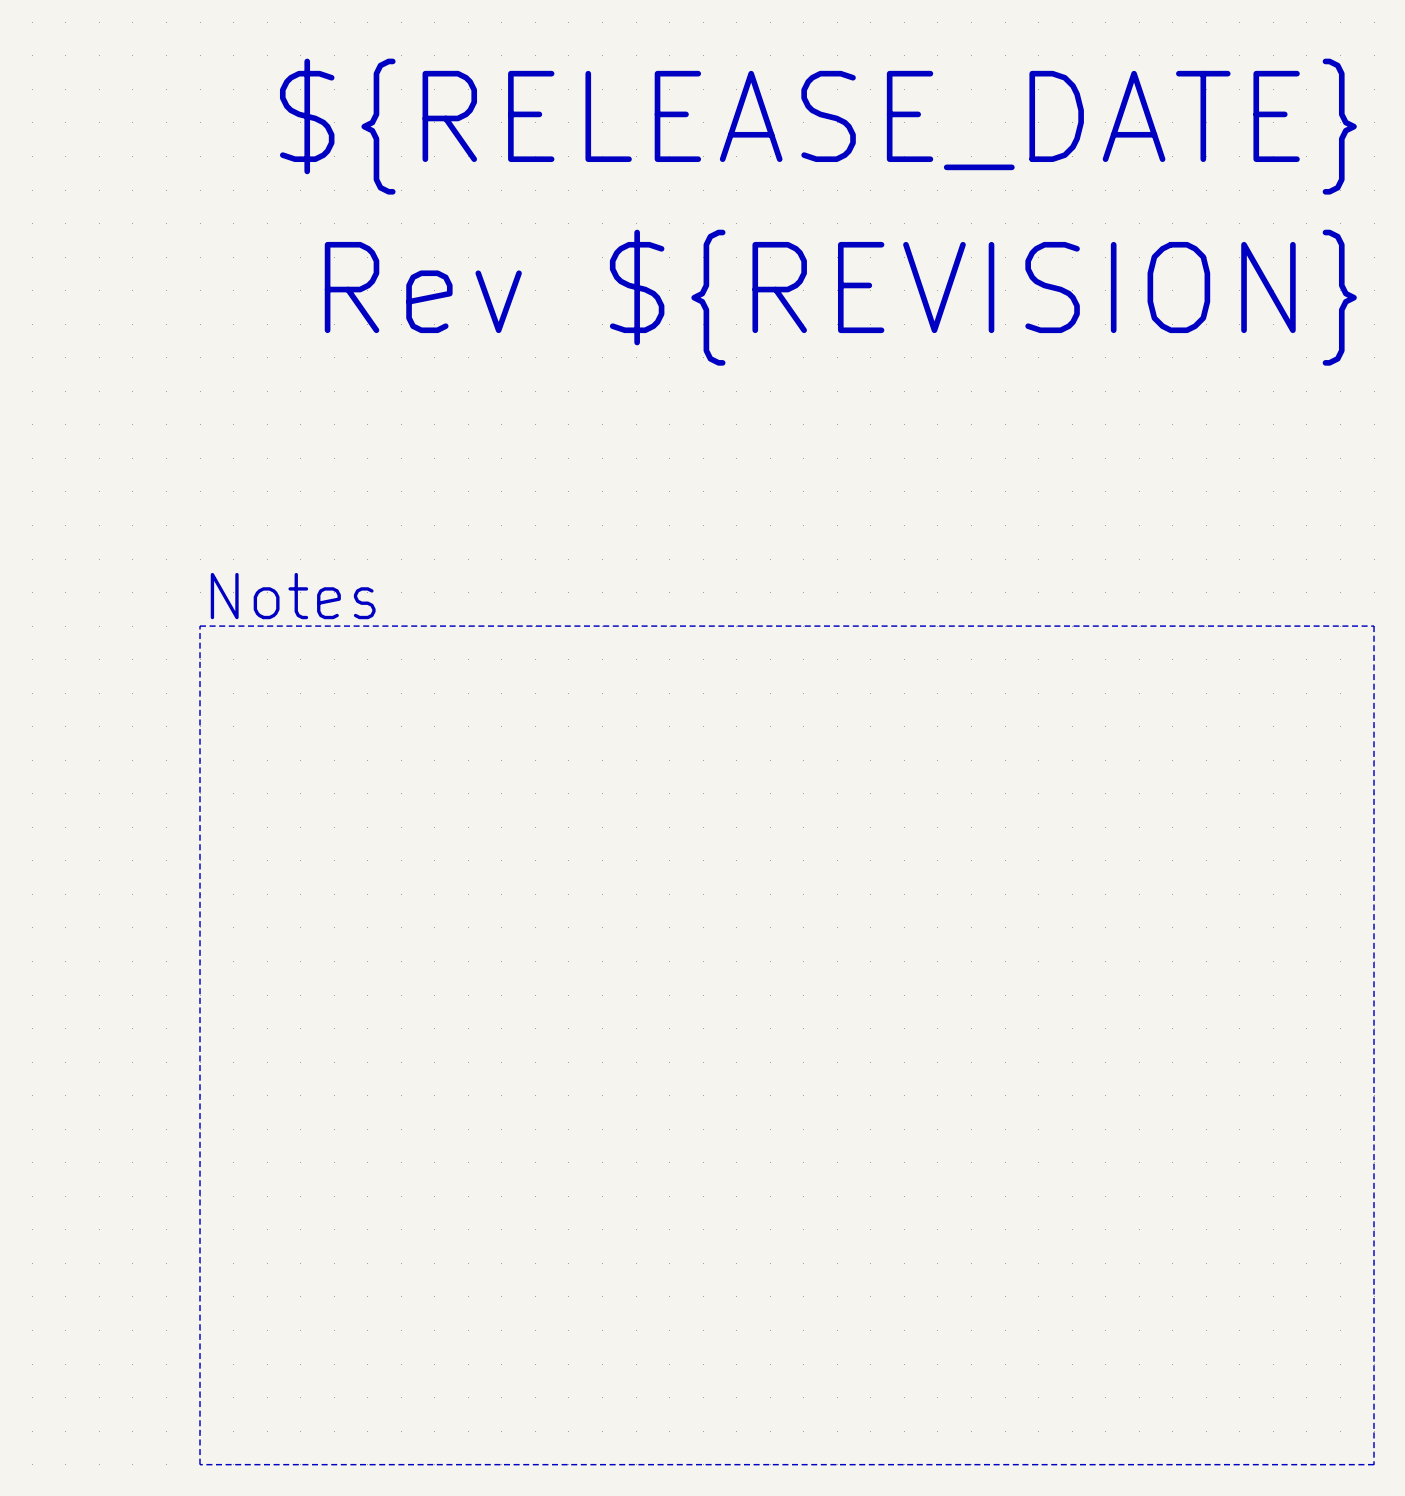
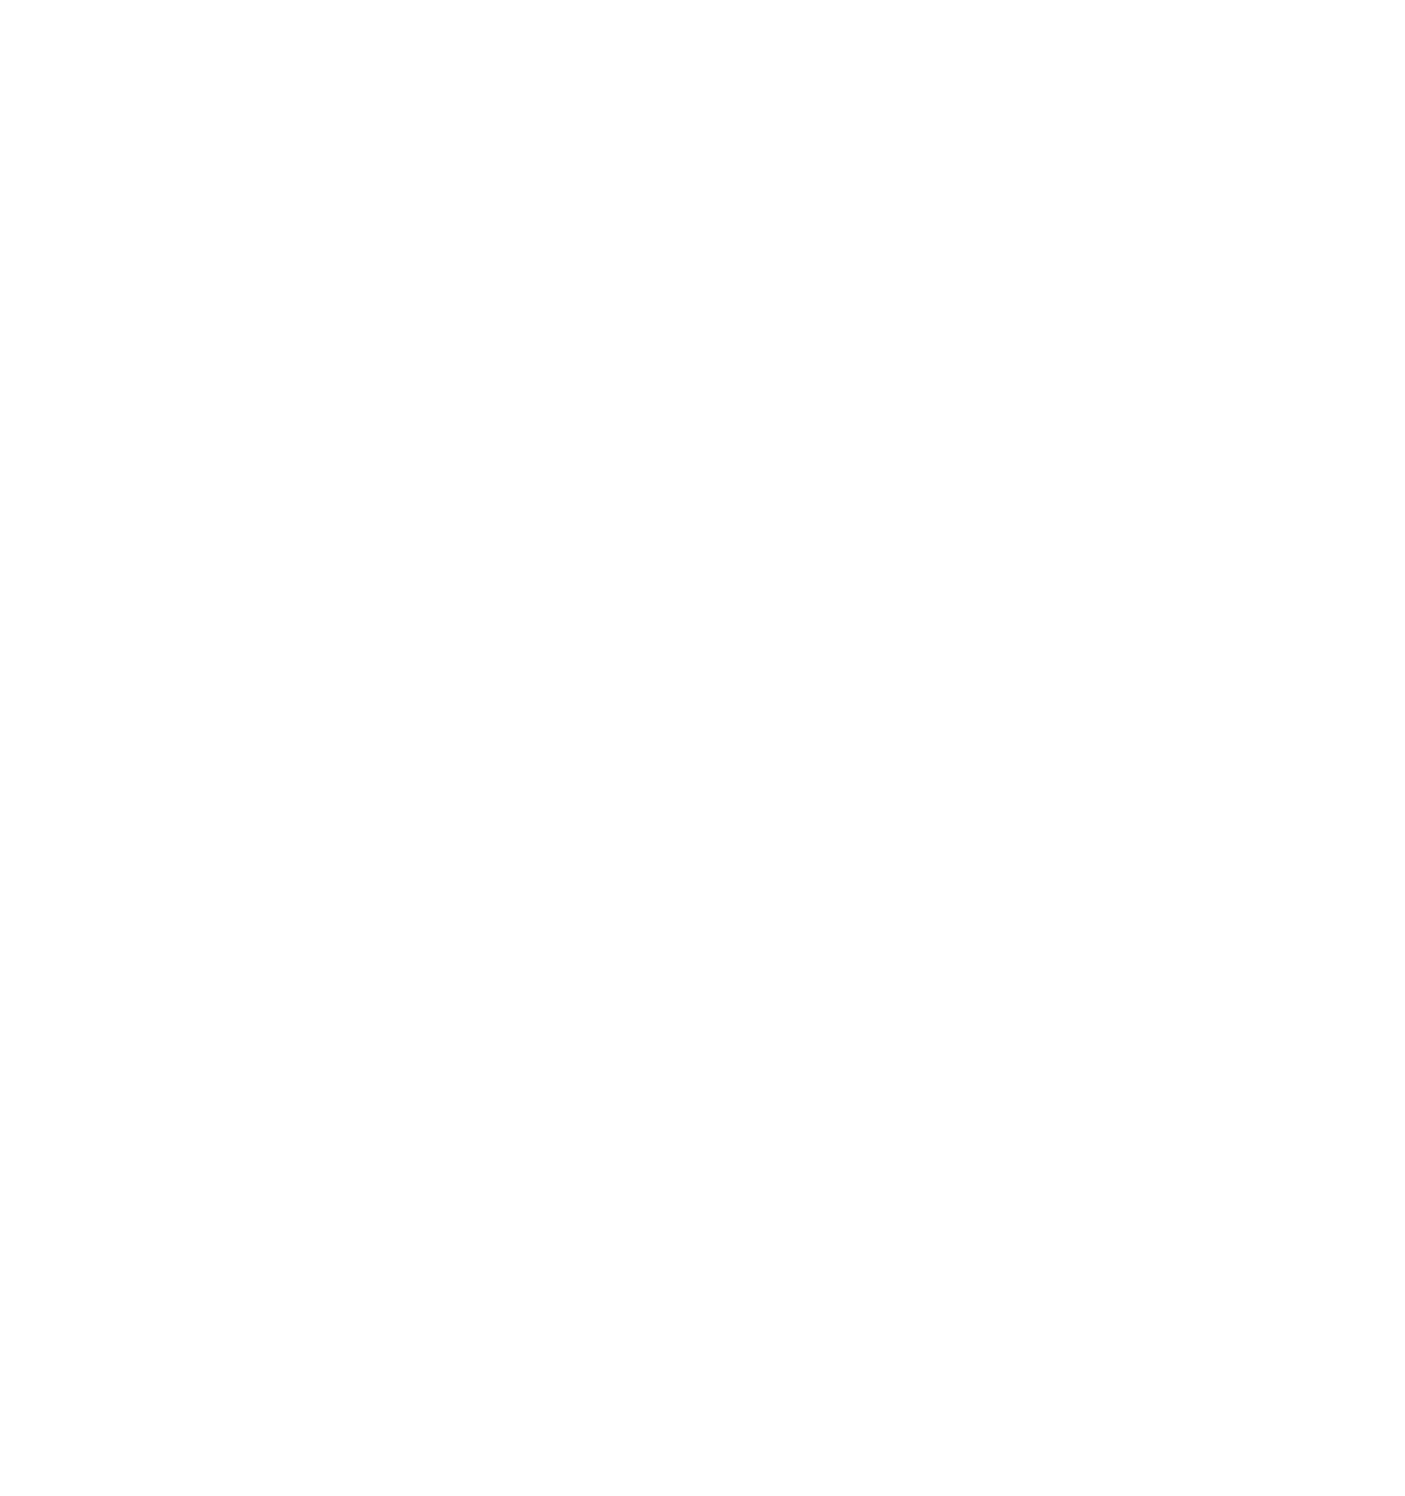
text: ${RELEASE_DATE} (818, 126) -> none
text: Rev ${REVISION} (840, 297) -> none
text: Notes (293, 596) -> none
line: (200, 626) (1374, 626) (1374, 1464) (200, 1464) (200, 626) -> none

